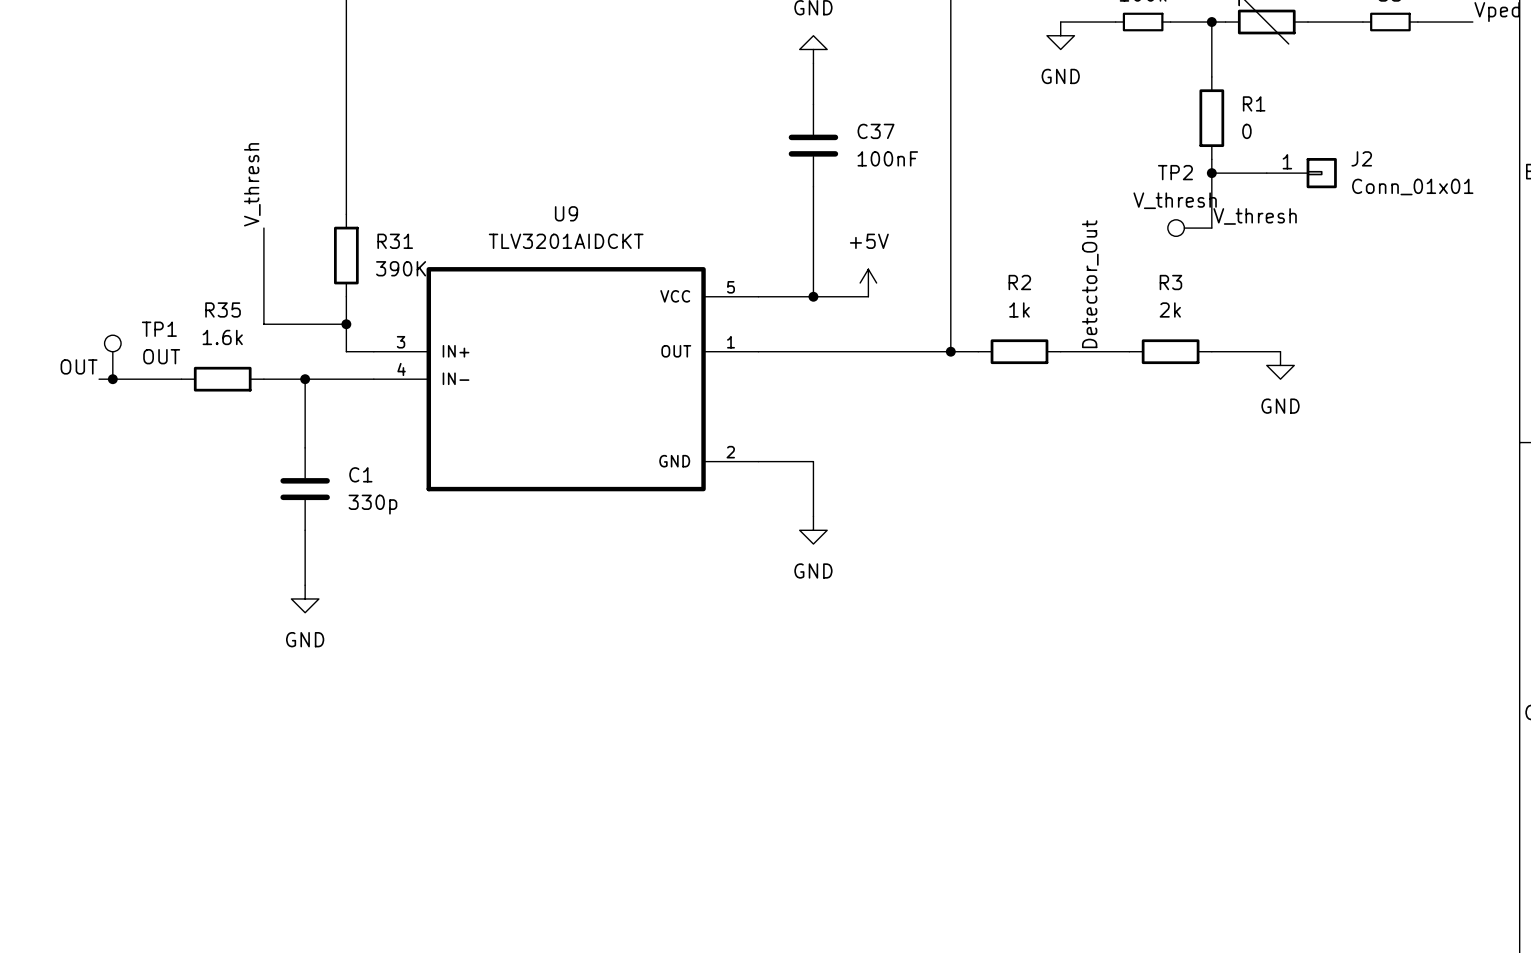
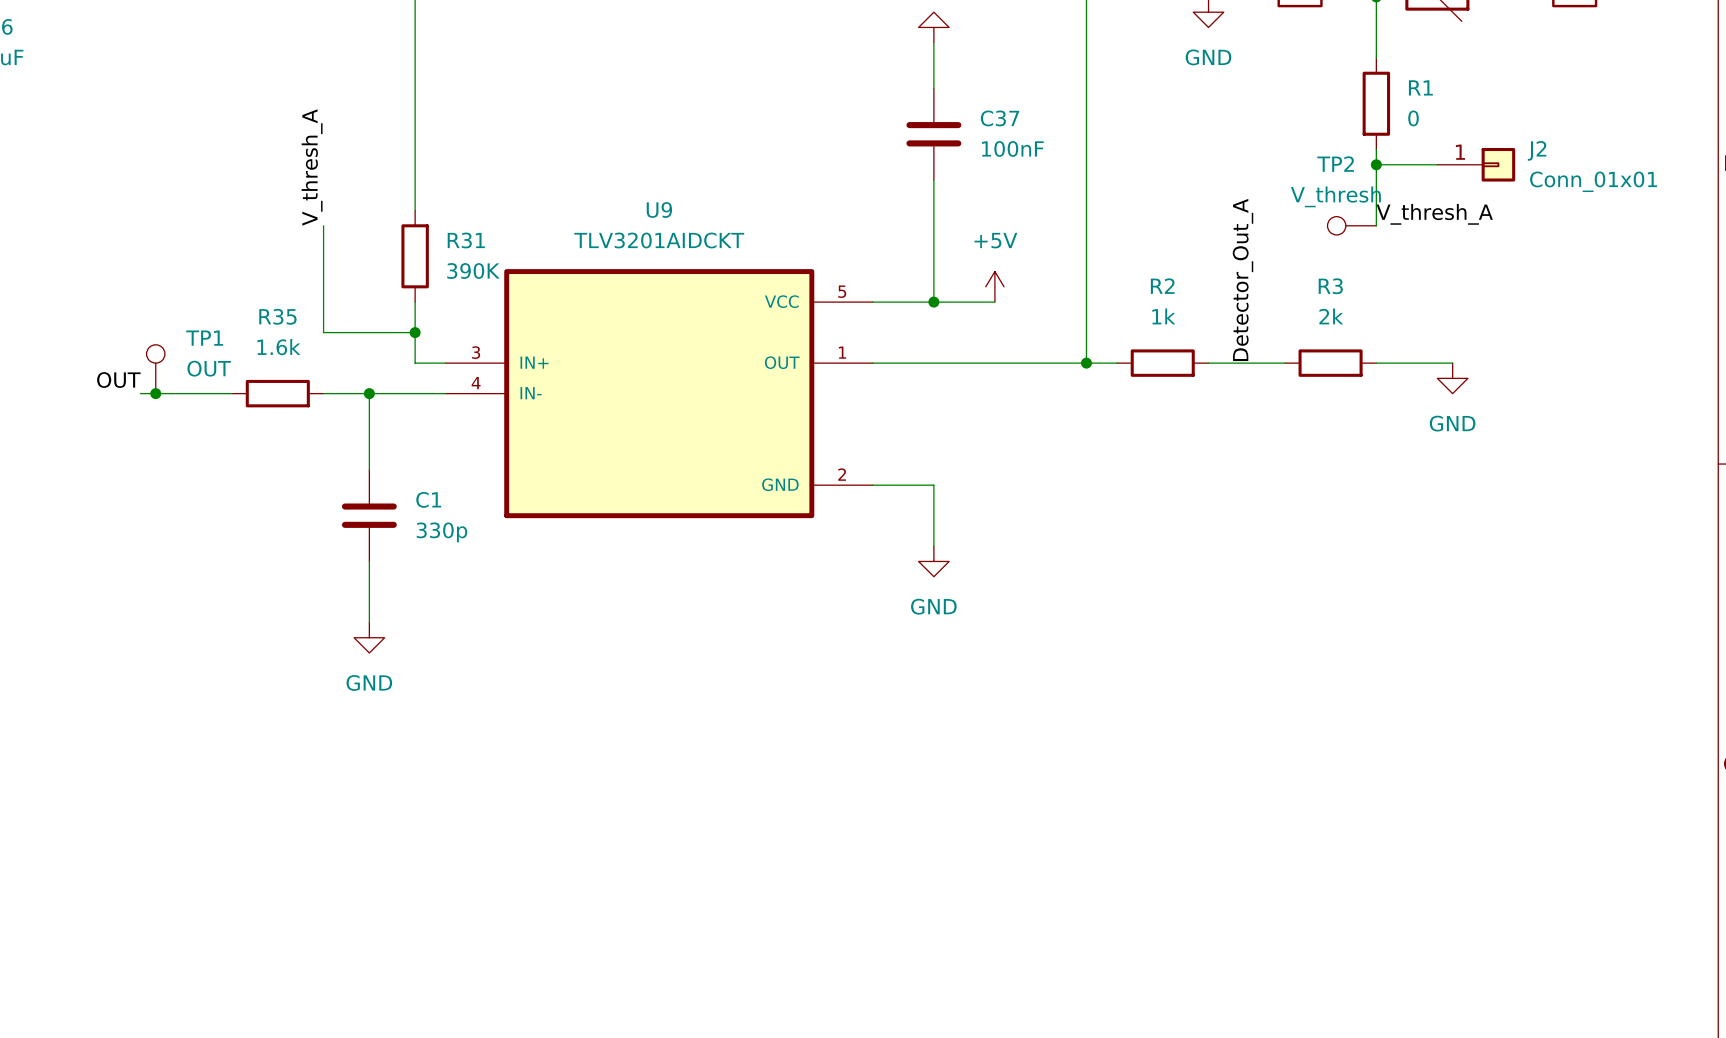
label: V_thresh (252, 184) -> V_thresh_A (312, 167)
label: V_thresh (1255, 216) -> V_thresh_A (1434, 214)
label: Detector_Out (1090, 284) -> Detector_Out_A (1243, 279)

